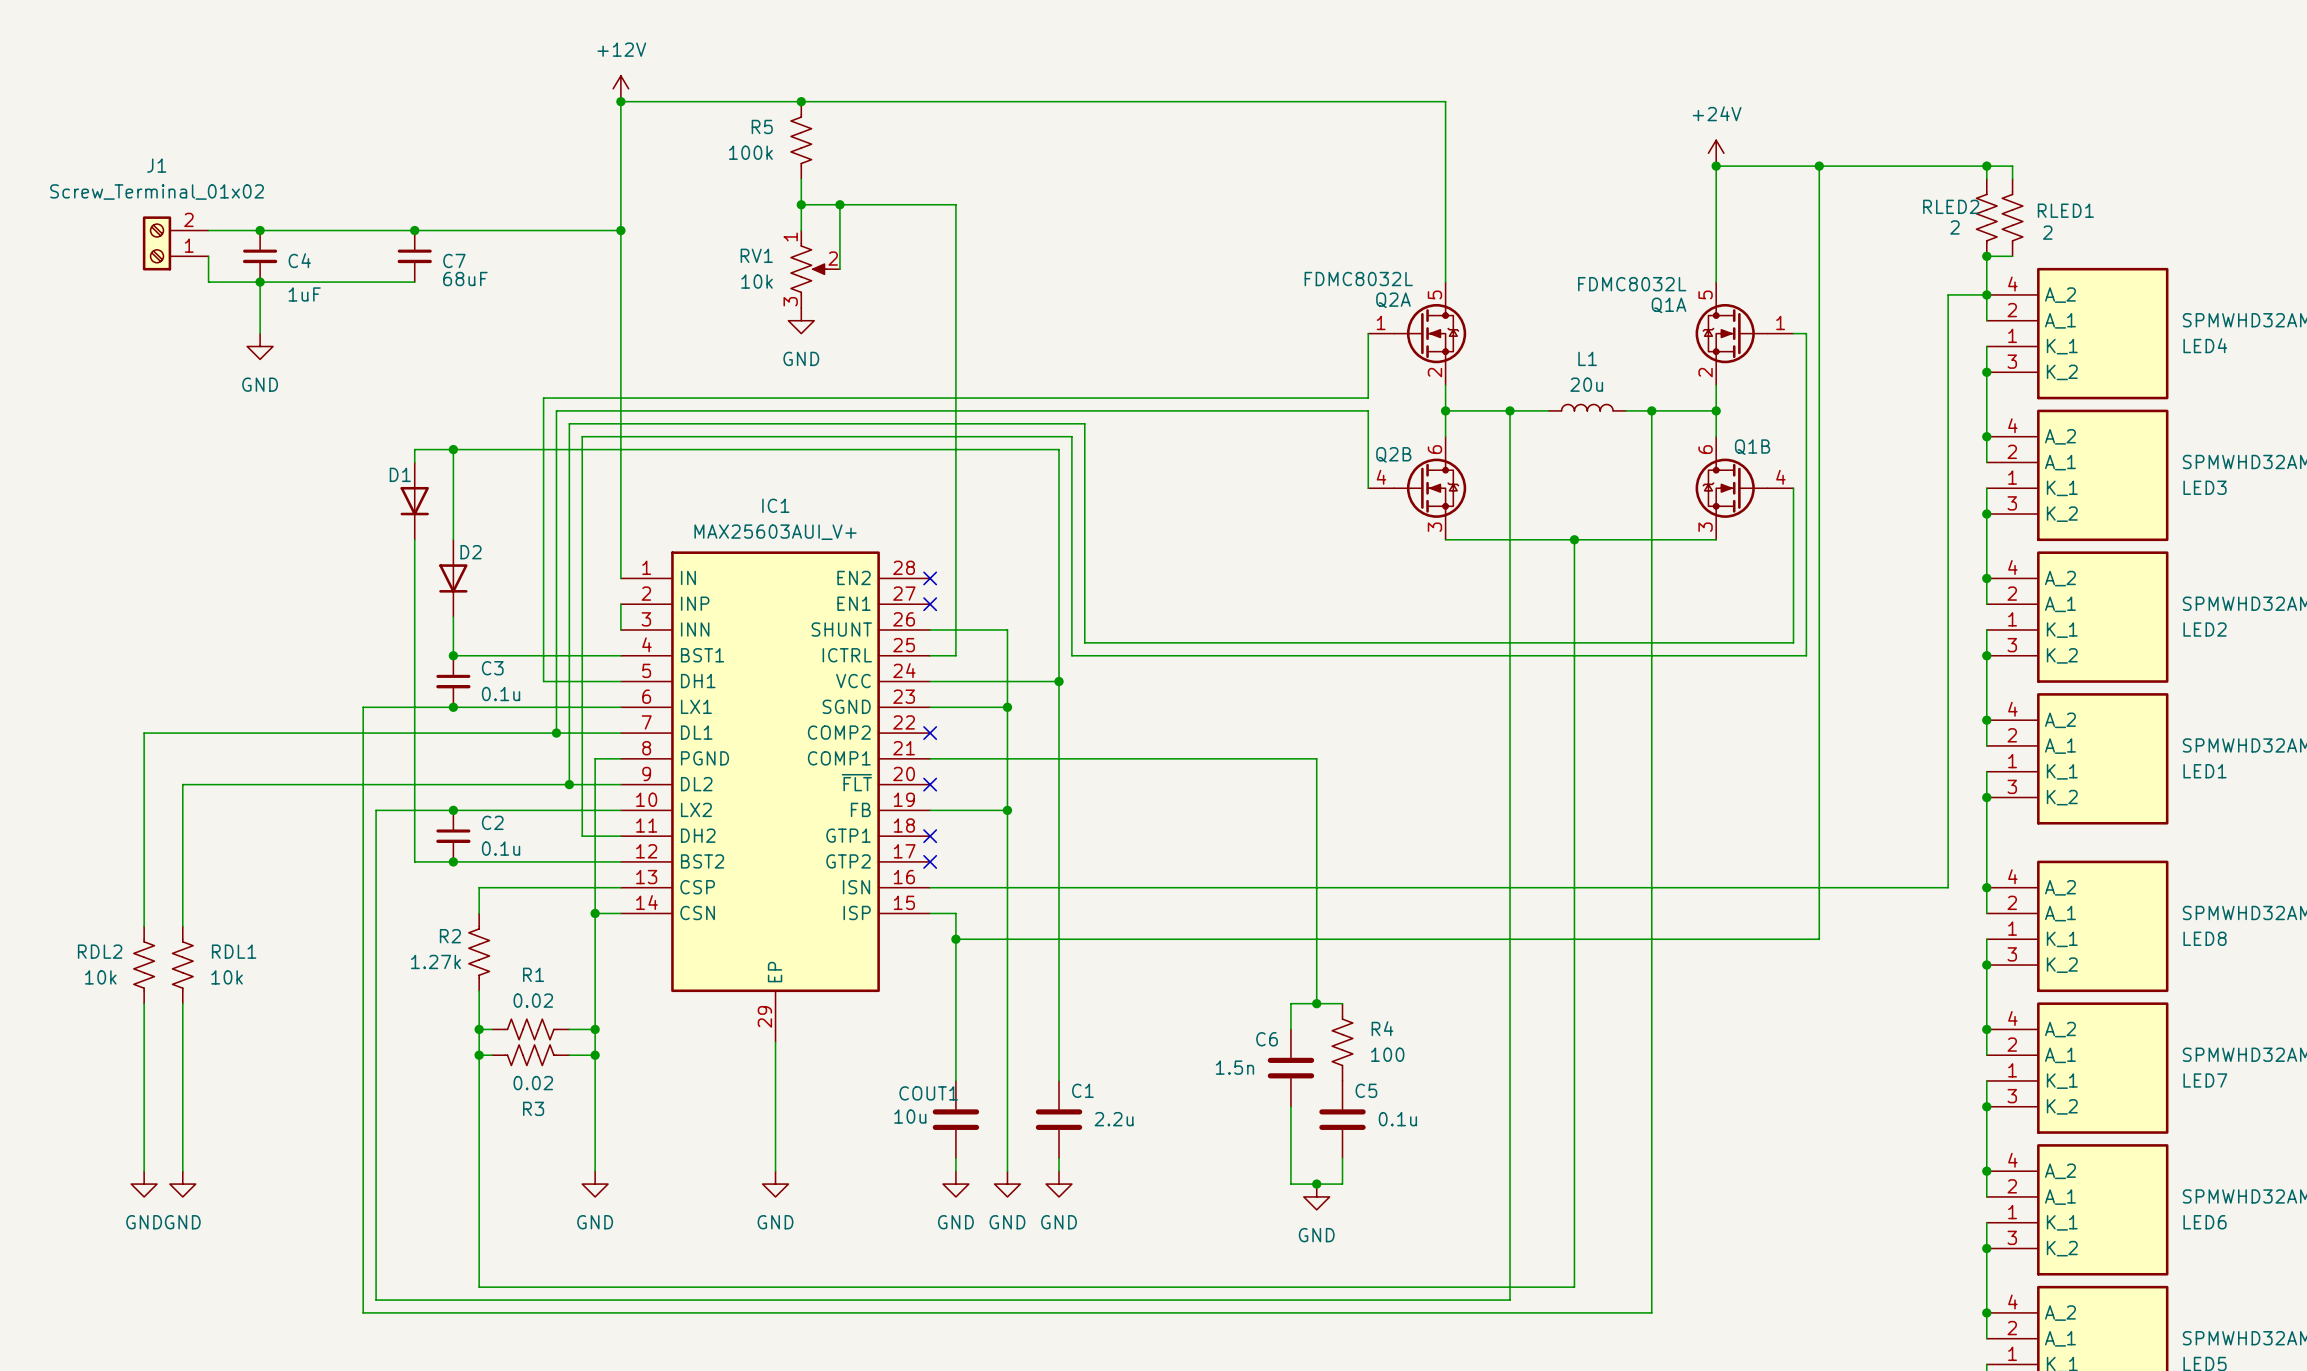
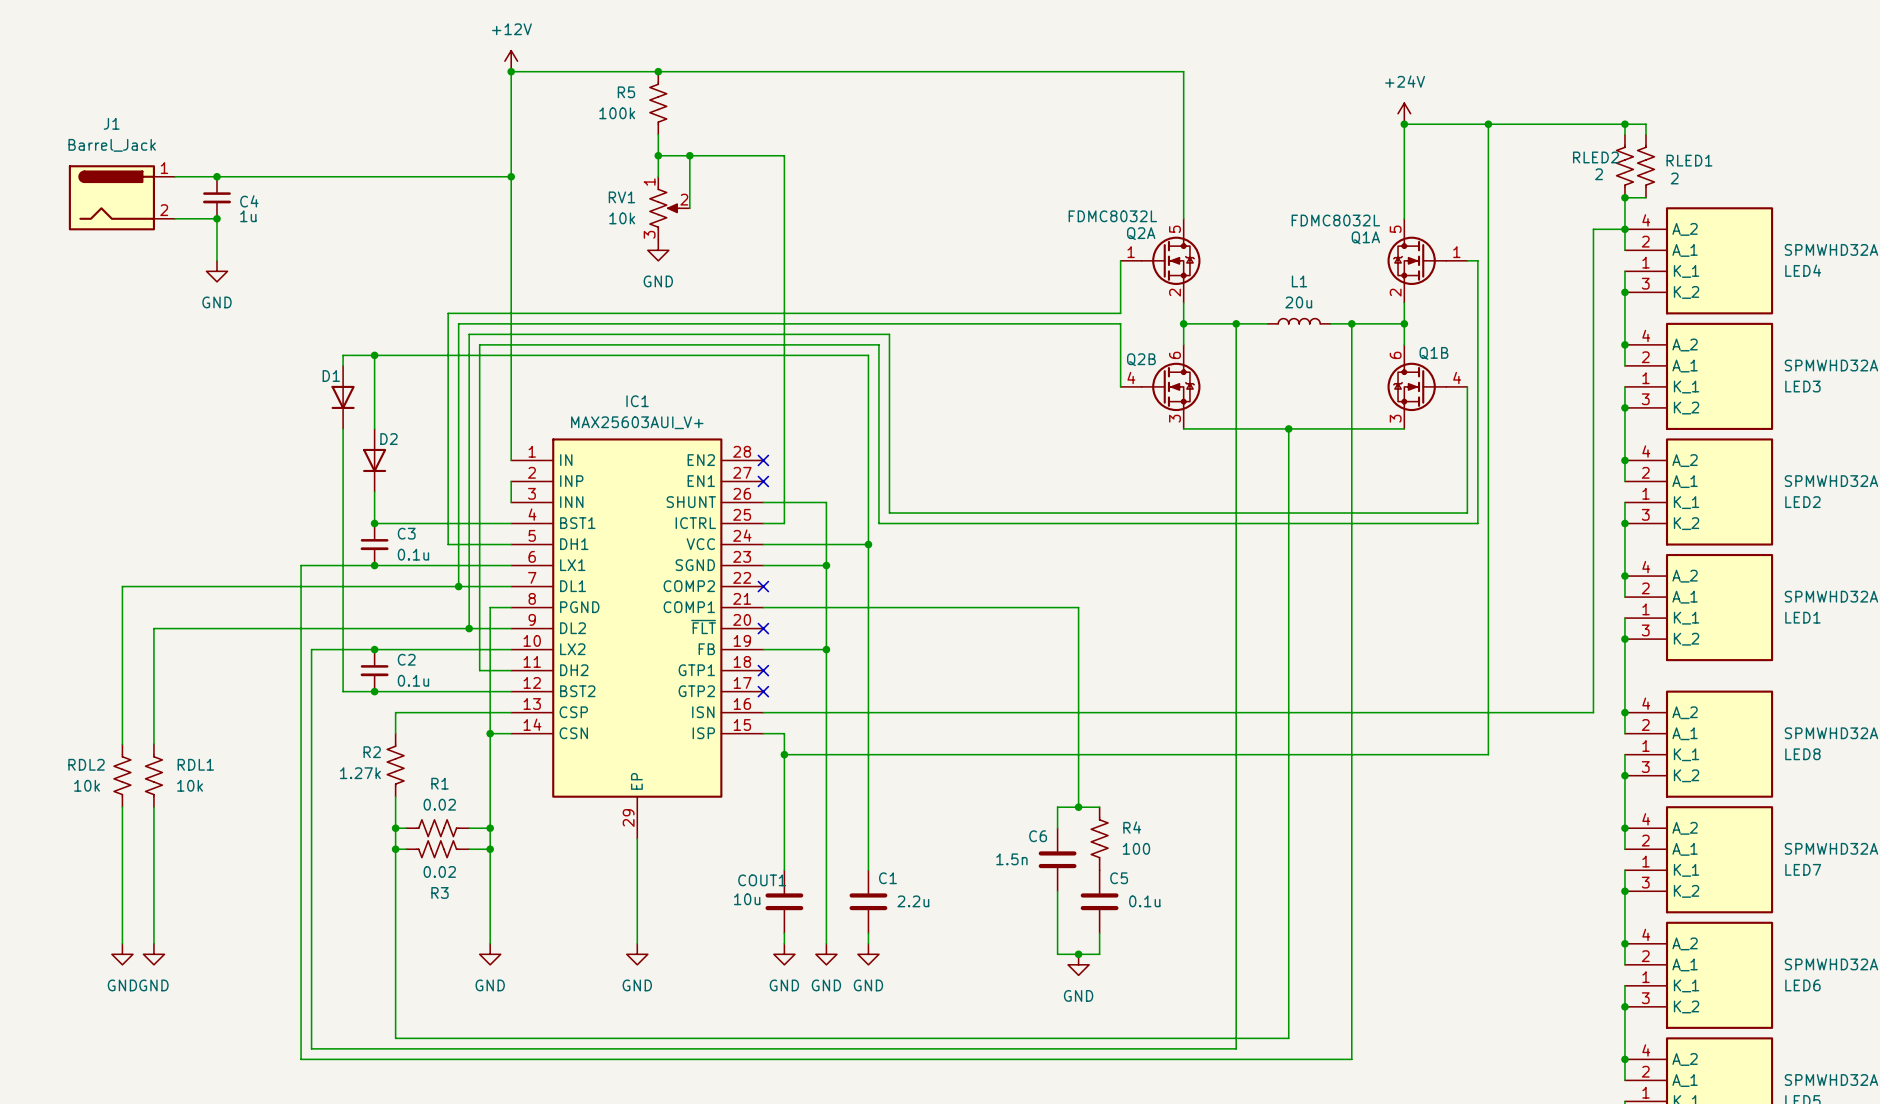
J1 value: Screw_Terminal_01x02 (157, 192) -> Barrel_Jack (112, 145)
J1 symbol: [142, 216, 209, 271] -> [68, 165, 175, 231]
junction: (414, 230) -> none
wire: (208, 256) (208, 282) -> none
C7: 68uF (414, 256) -> none
wire: (260, 282) (414, 282) -> none
C4 value: 1uF (304, 294) -> 1u (248, 216)

